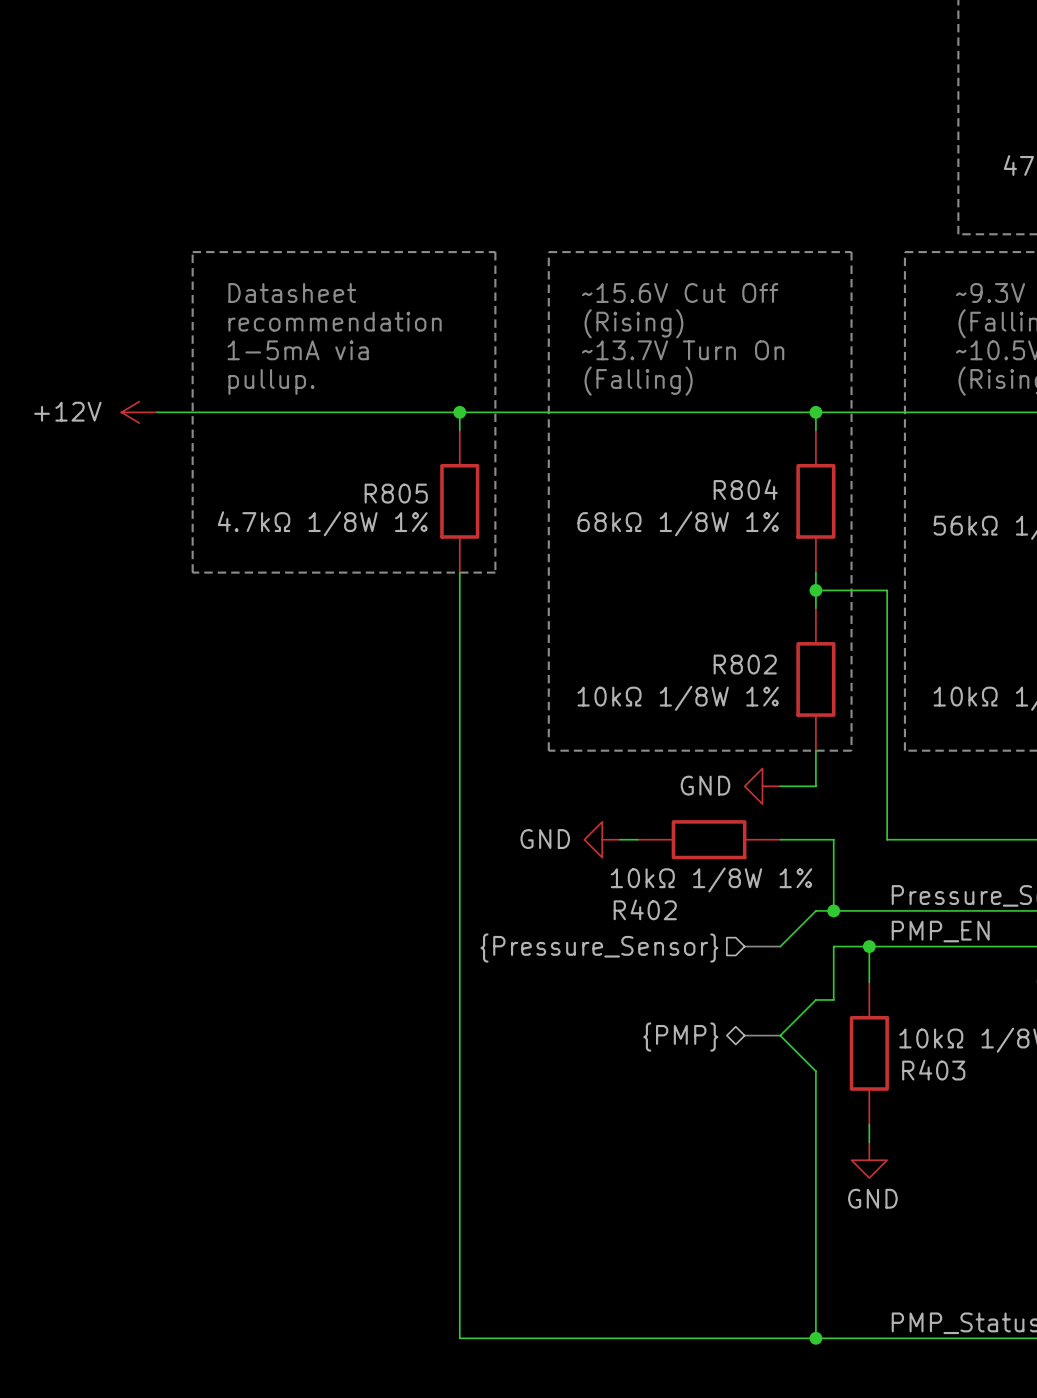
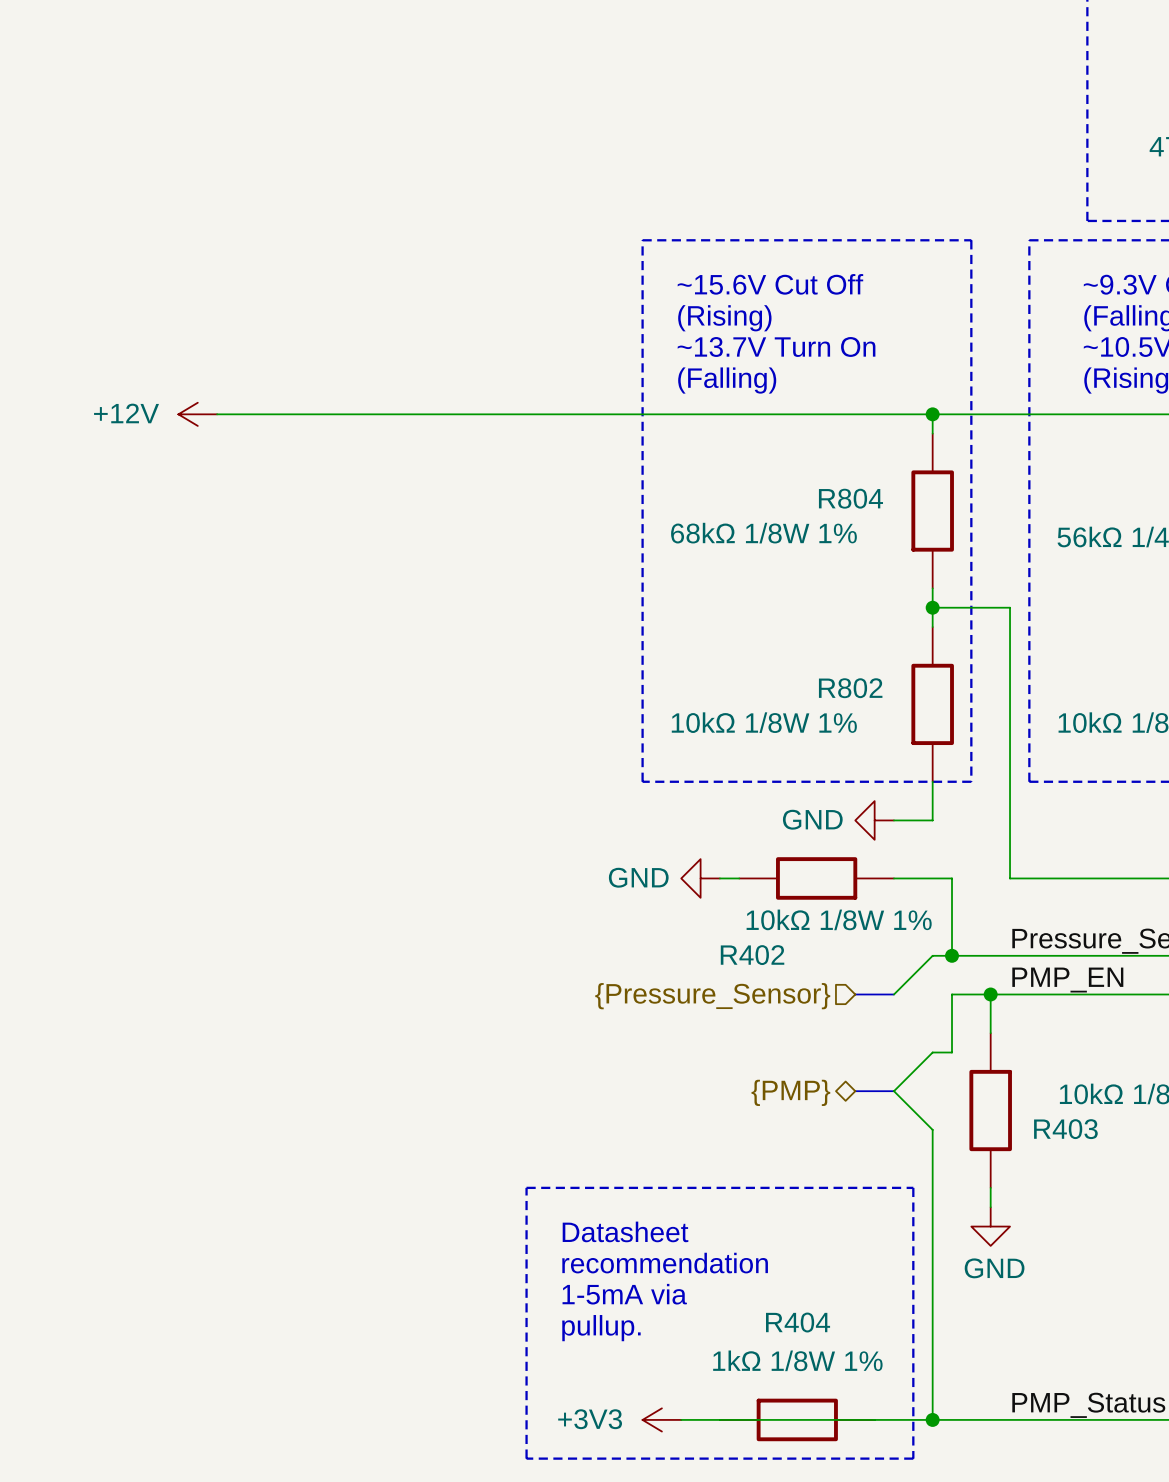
line: (192, 252) (495, 252) (495, 572) (192, 572) (192, 252) -> none
text: Datasheet (292, 292) -> none
text: recommendation (335, 321) -> none
text: 1-5mA via (298, 350) -> none
text: pullup. (271, 381) -> none
wire: (459, 412) (459, 430) -> none
junction: (459, 412) -> none
R805: 4.7kΩ 1/8W 1% (459, 501) -> none
wire: (459, 572) (459, 1338) (584, 1338) -> none
line: none -> (526, 1187) (913, 1187) (913, 1458) (526, 1458) (526, 1187)
text: none -> Datasheet (625, 1231)
text: none -> recommendation (665, 1263)
text: none -> 1-5mA via (624, 1294)
text: none -> pullup. (601, 1328)
power symbol: none -> +3V3 (661, 1419)
R404: none -> 1kΩ 1/8W 1% (797, 1419)

